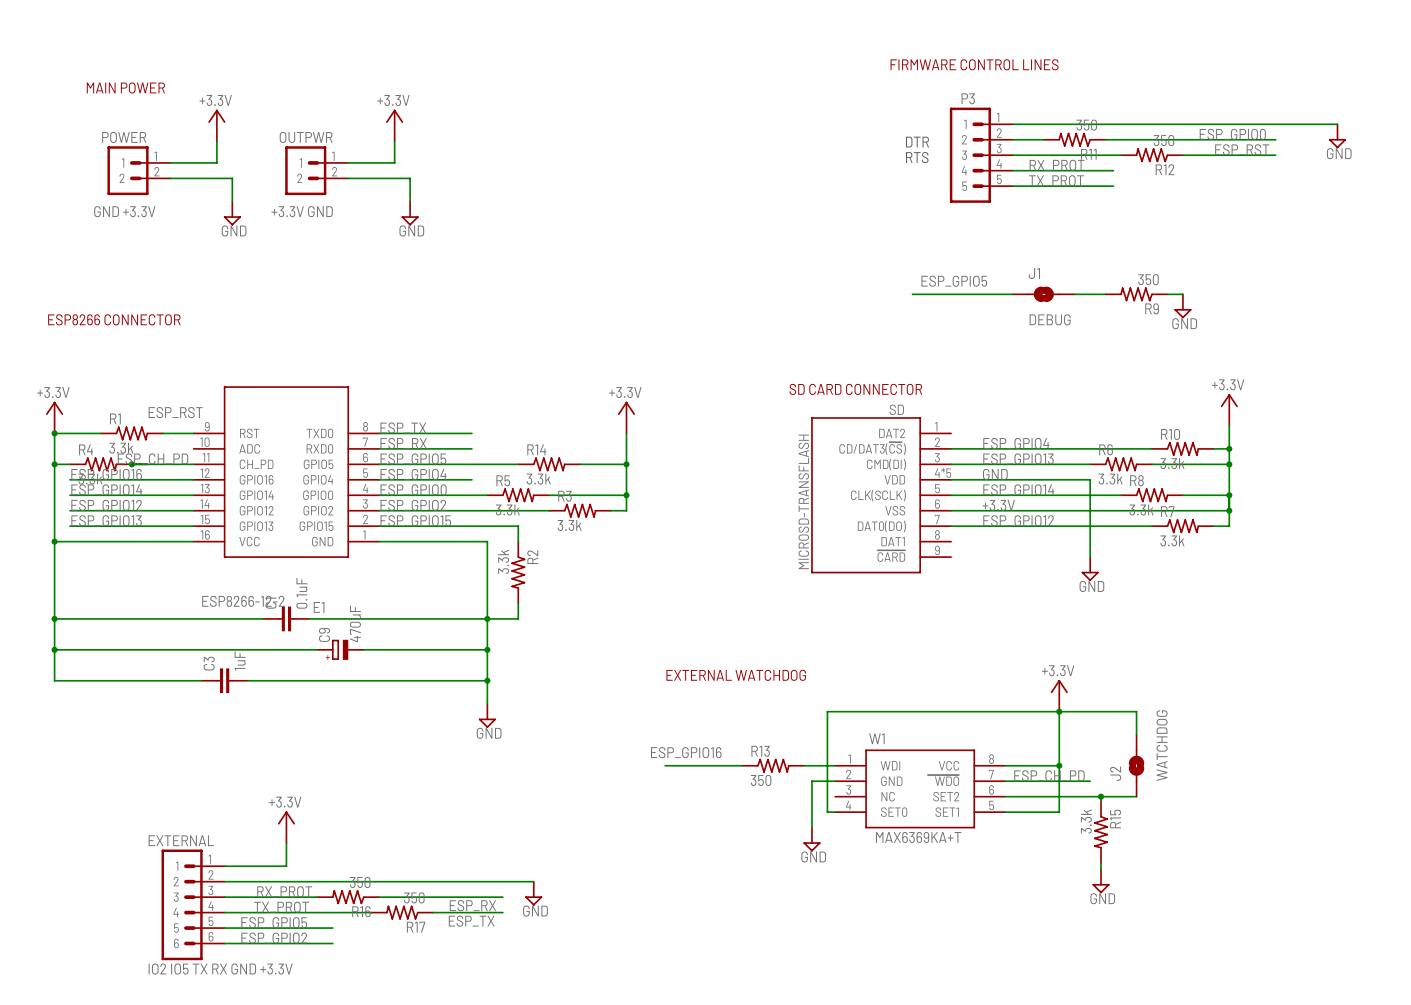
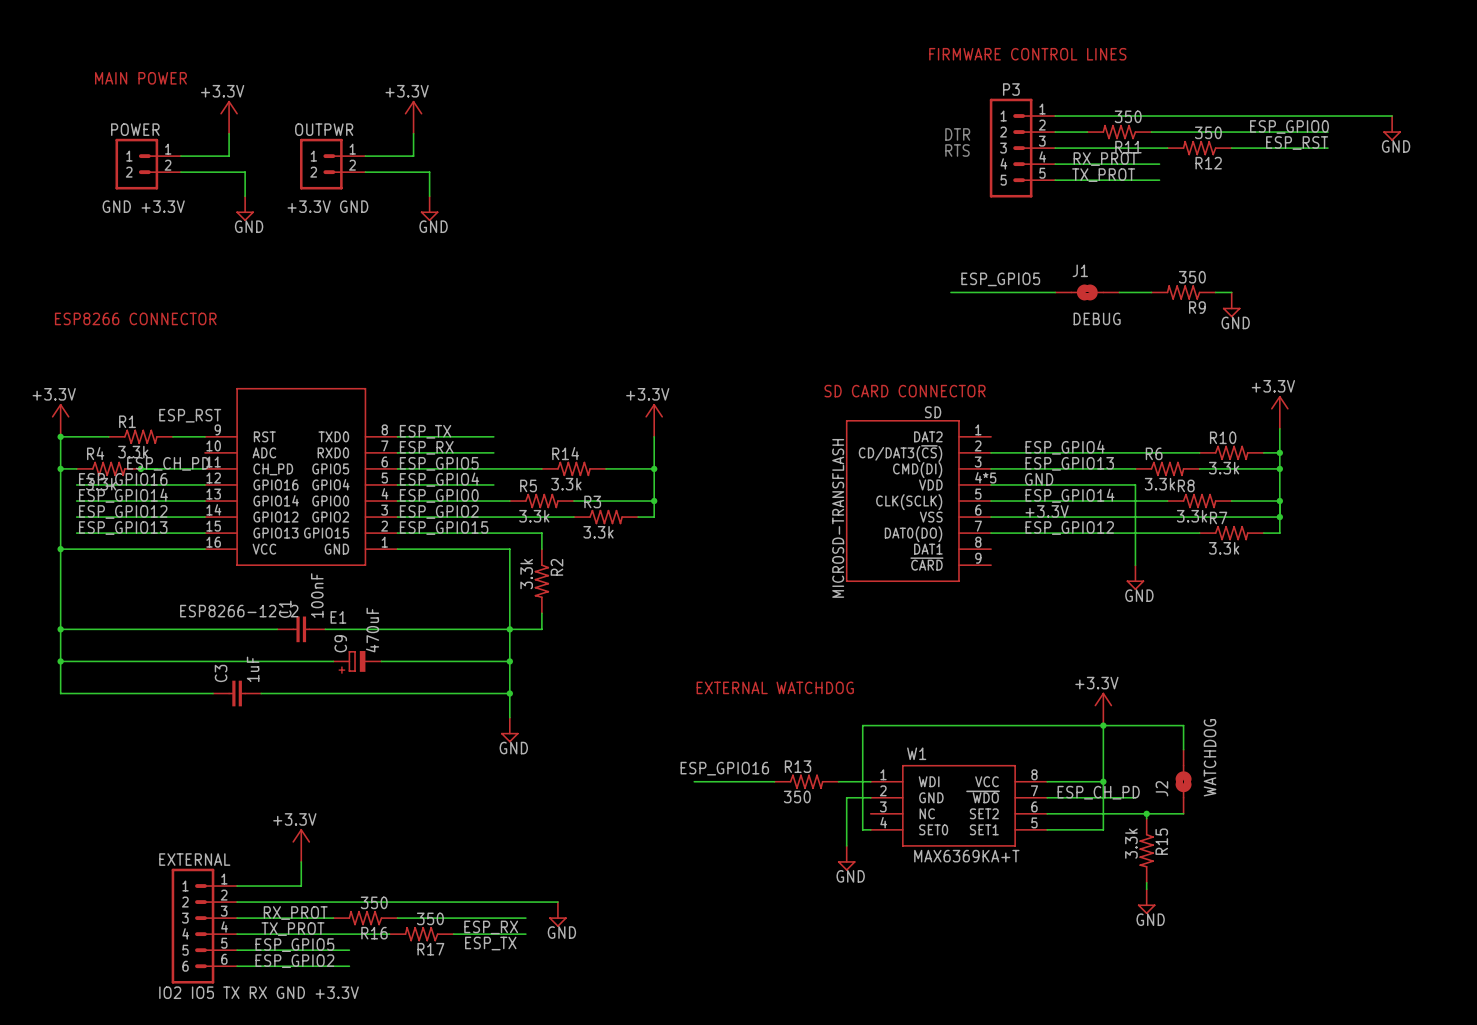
C1 value: 0.1uF (301, 593) -> 100nF (317, 595)

